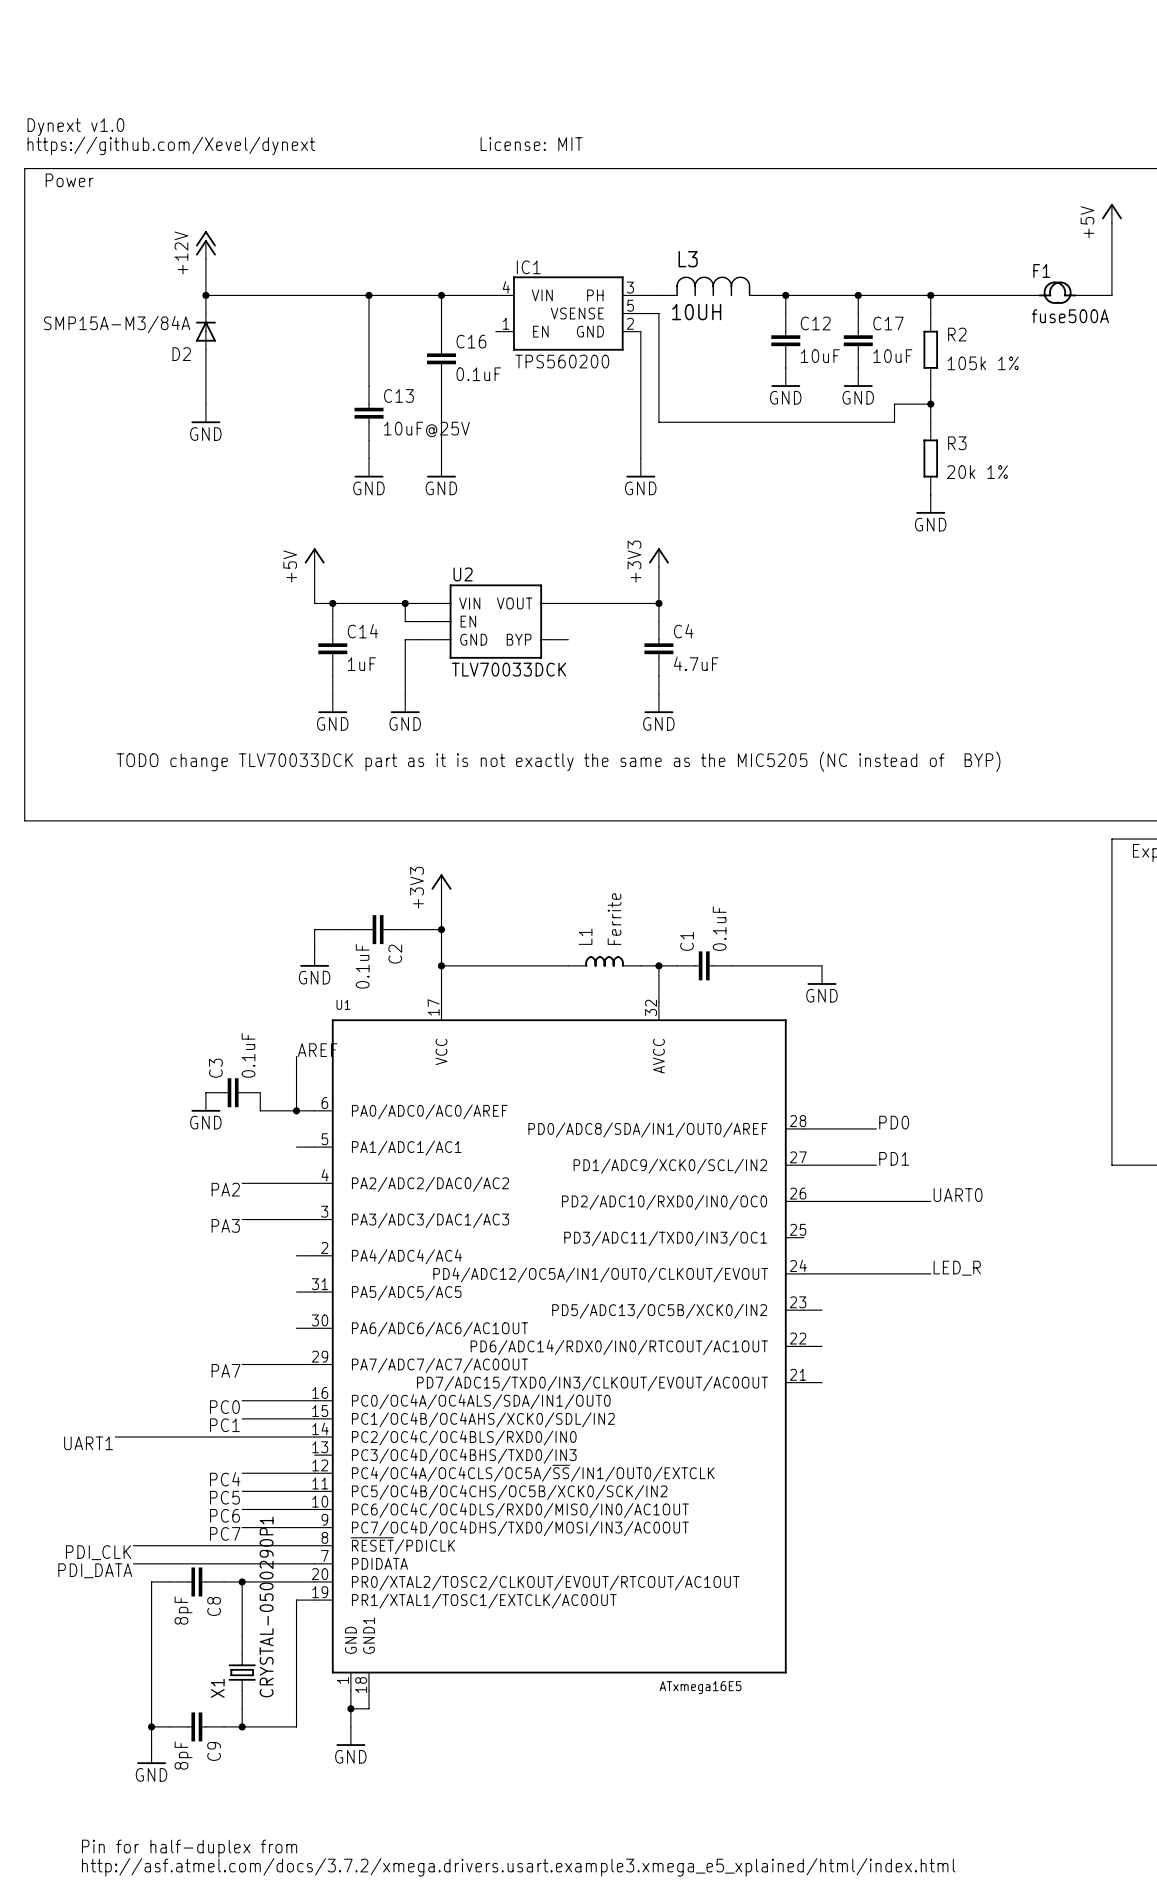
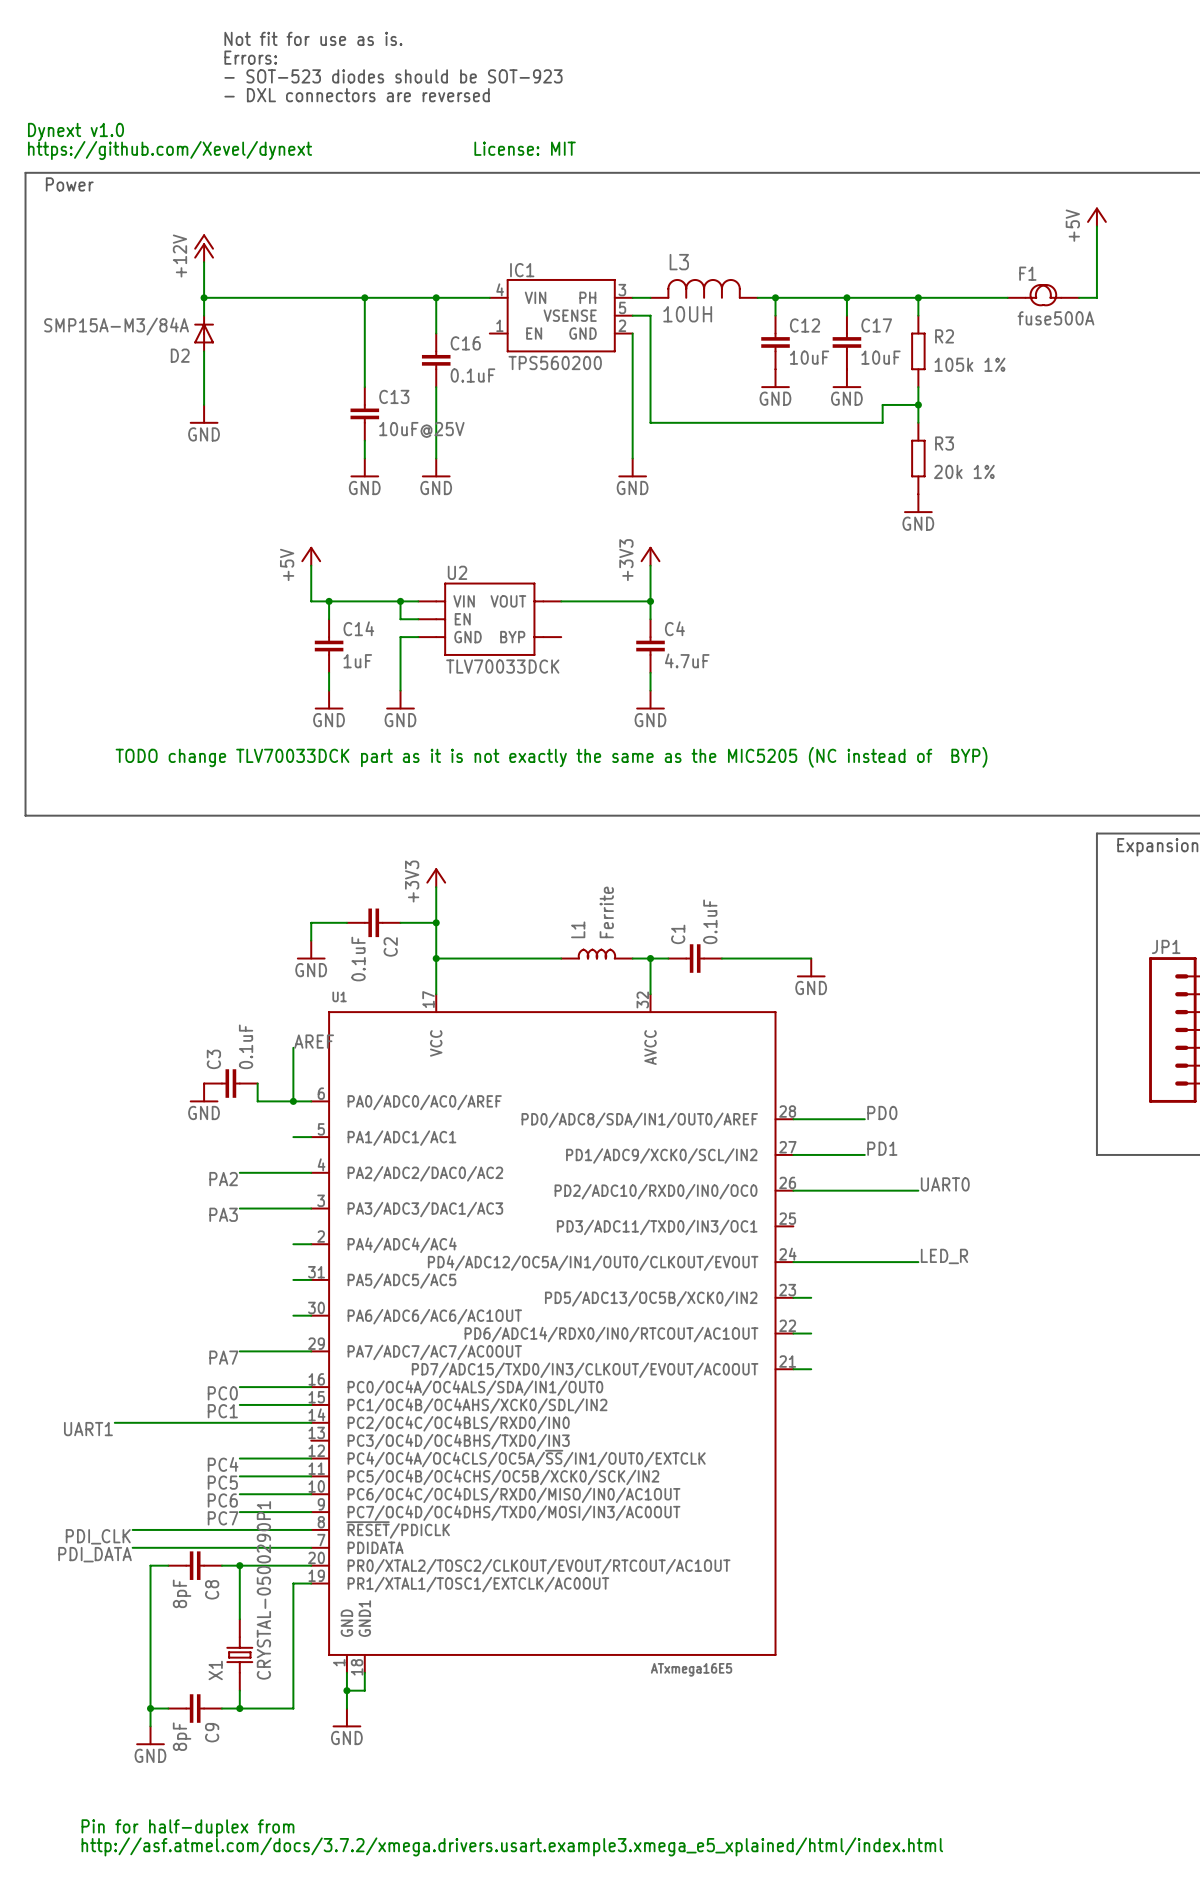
text: none -> Not fit for use as is. (313, 38)
text: none -> Errors: (250, 57)
text: none -> - SOT-523 diodes should be SOT-923 (393, 76)
text: none -> - DXL connectors are reversed (357, 95)

